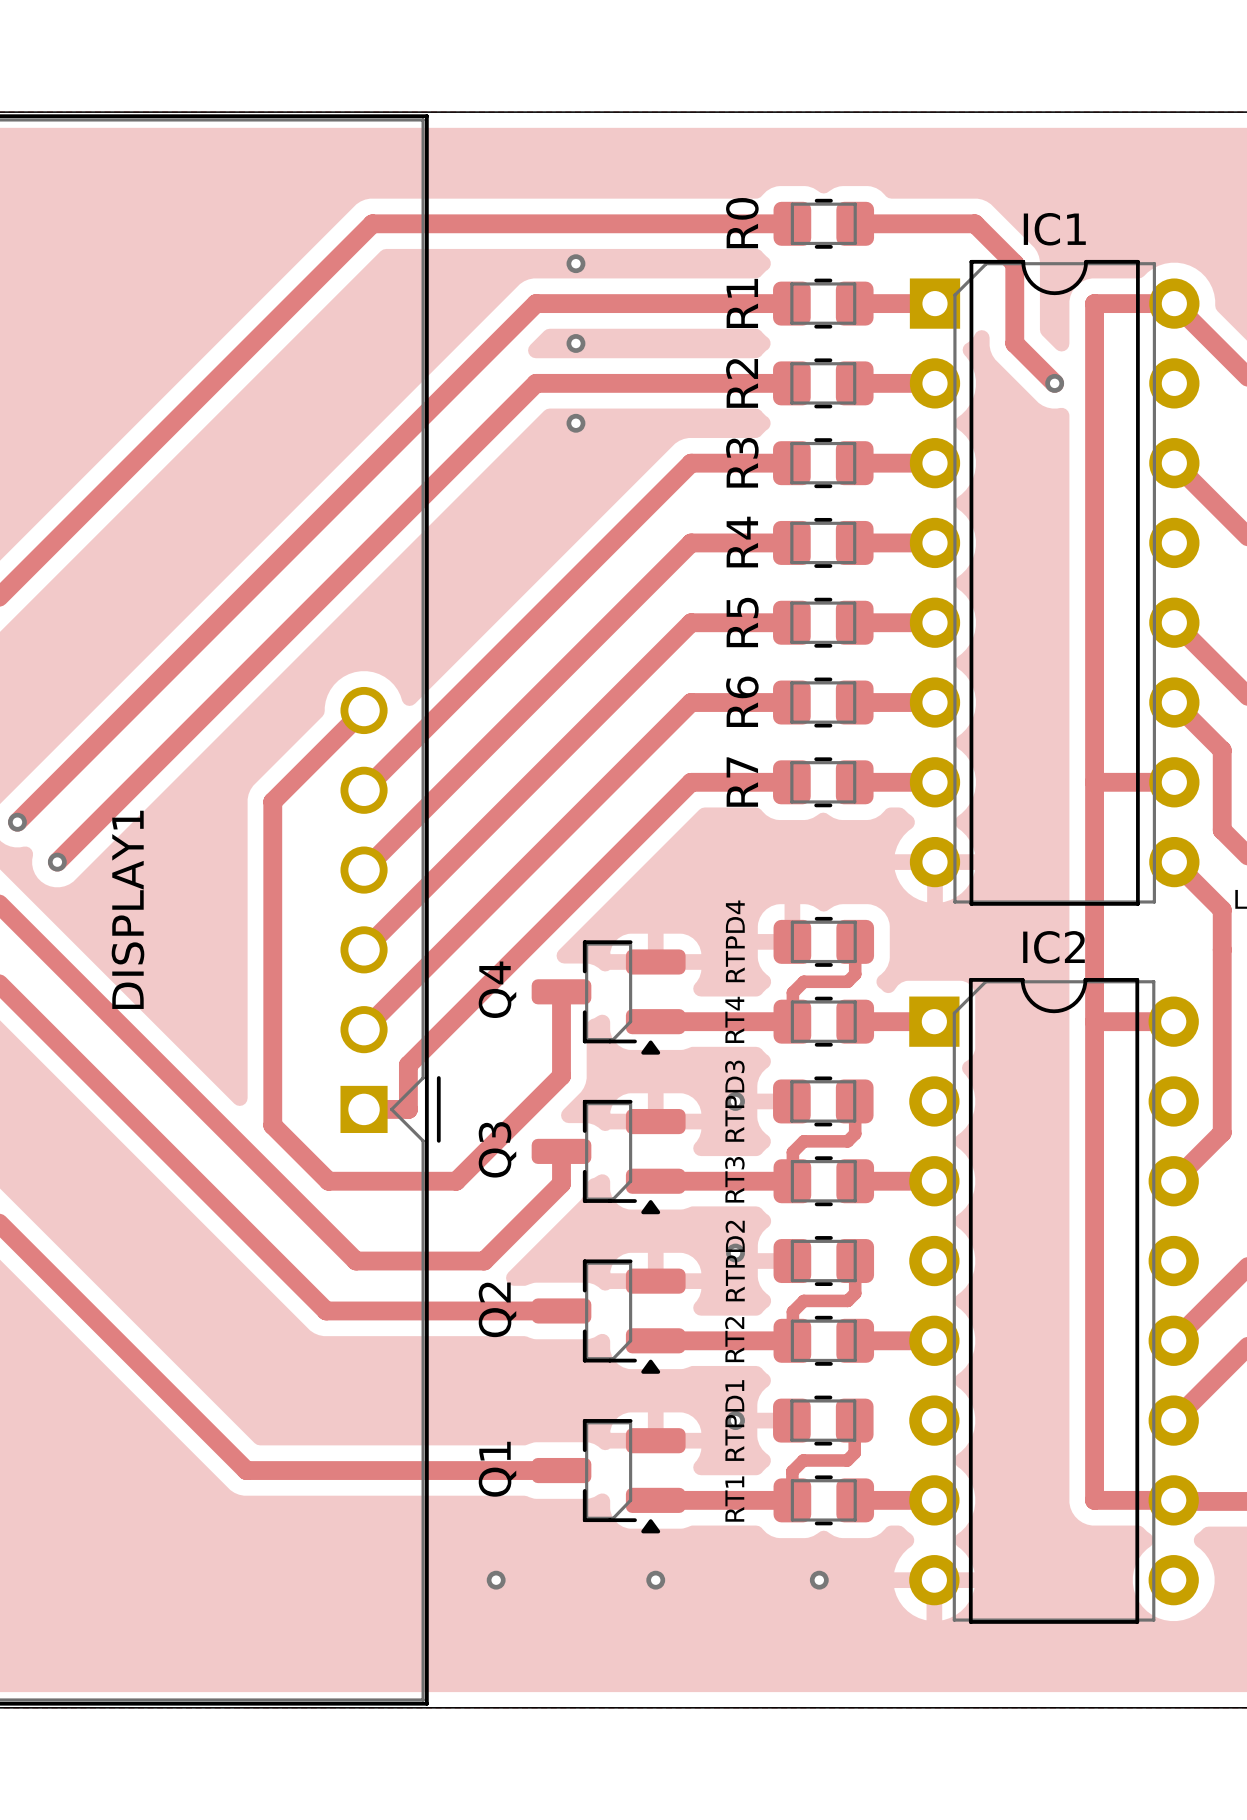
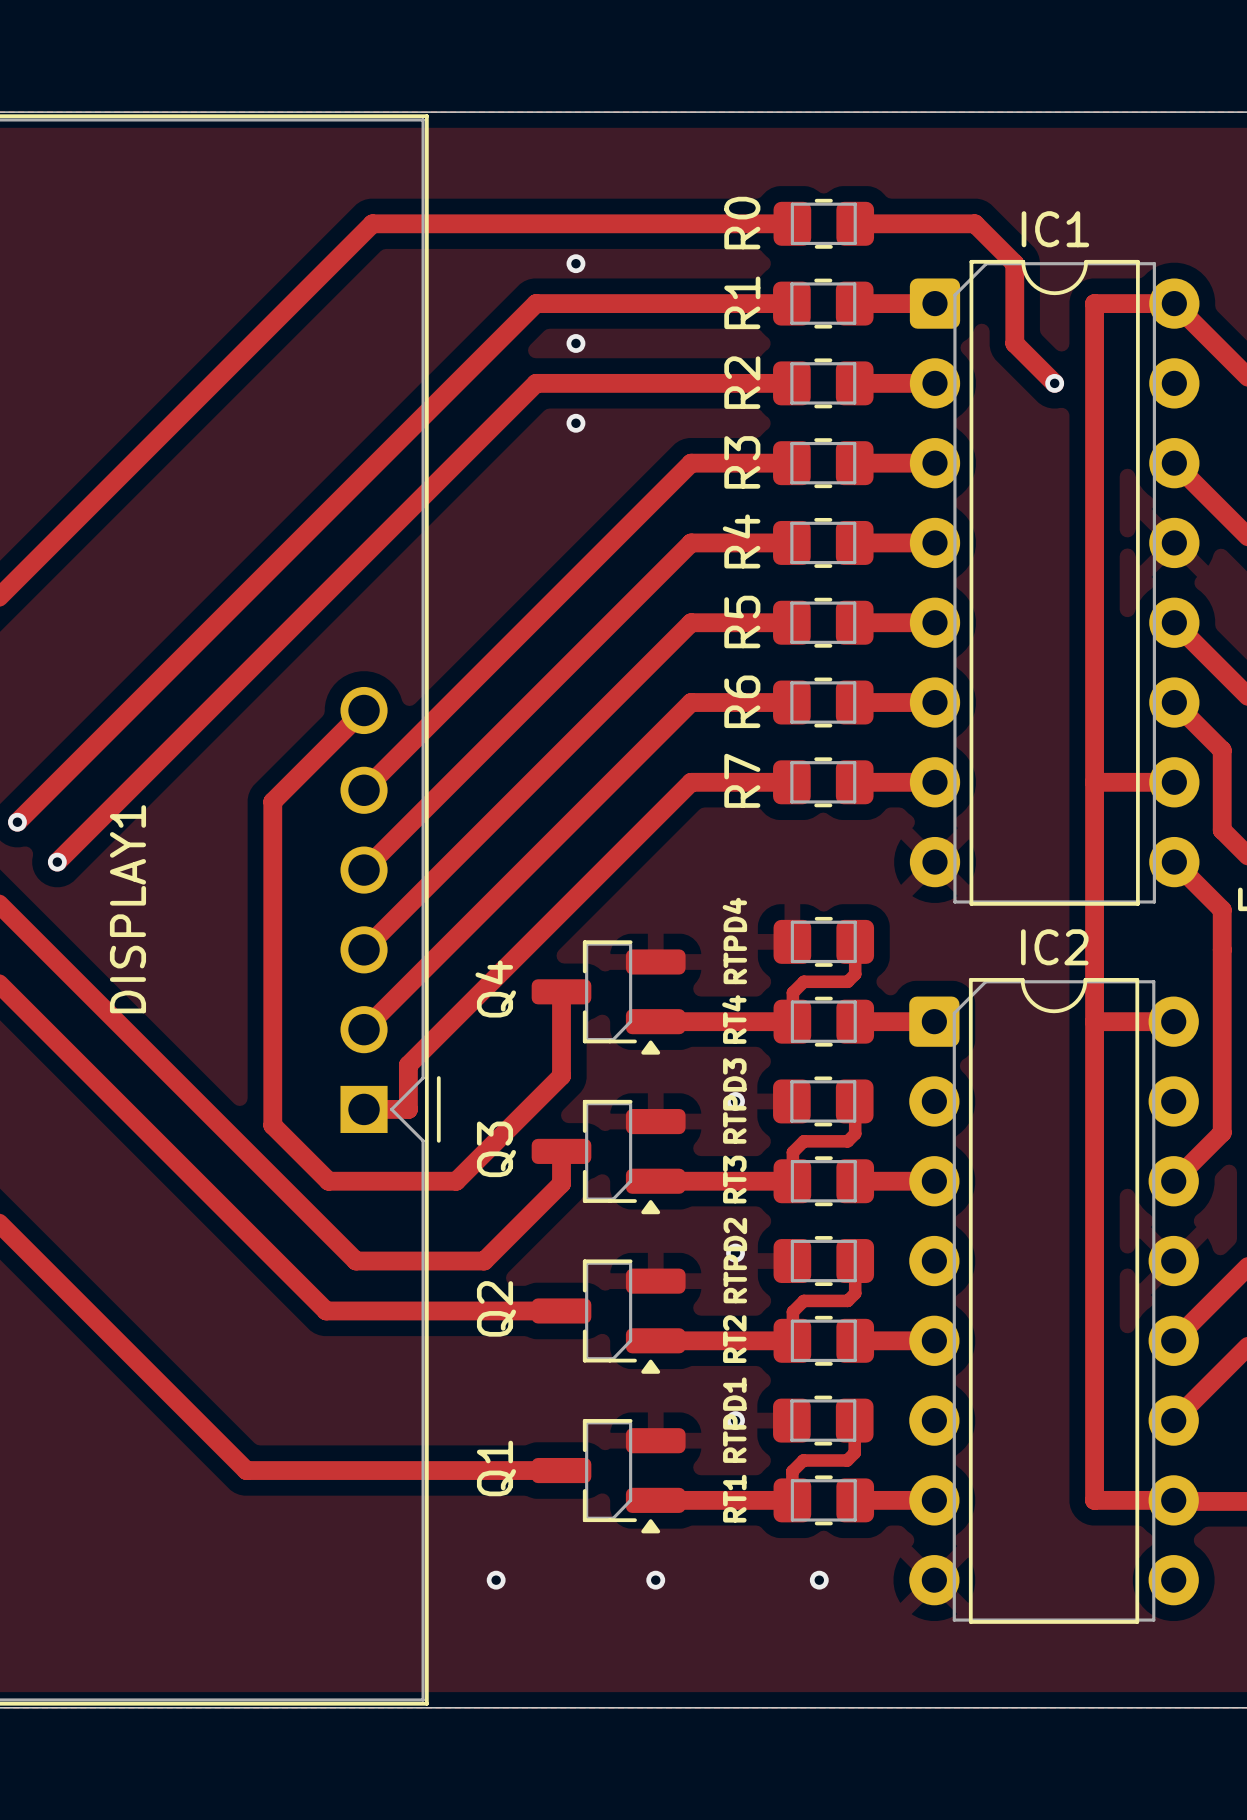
IC1 footprint: [909, 259, 1200, 906] -> [909, 259, 1200, 906]
IC2 footprint: [909, 978, 1199, 1624] -> [909, 978, 1199, 1624]

